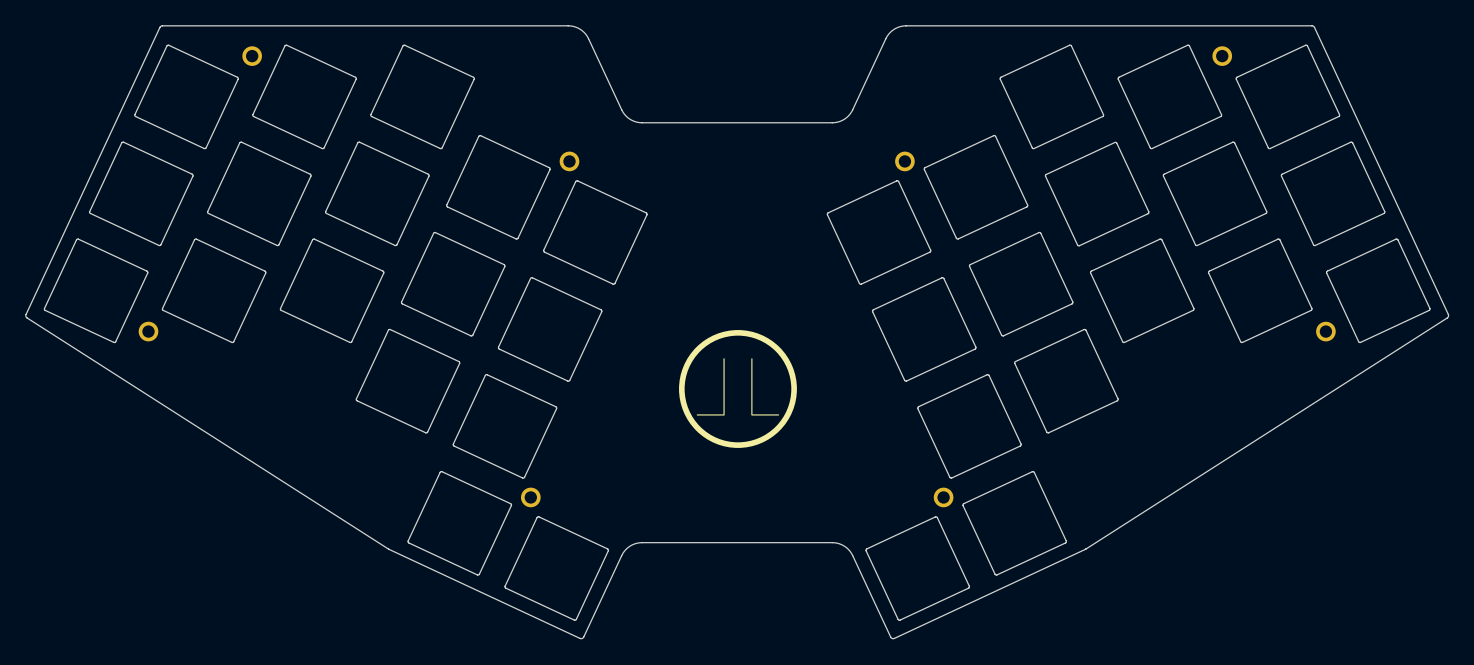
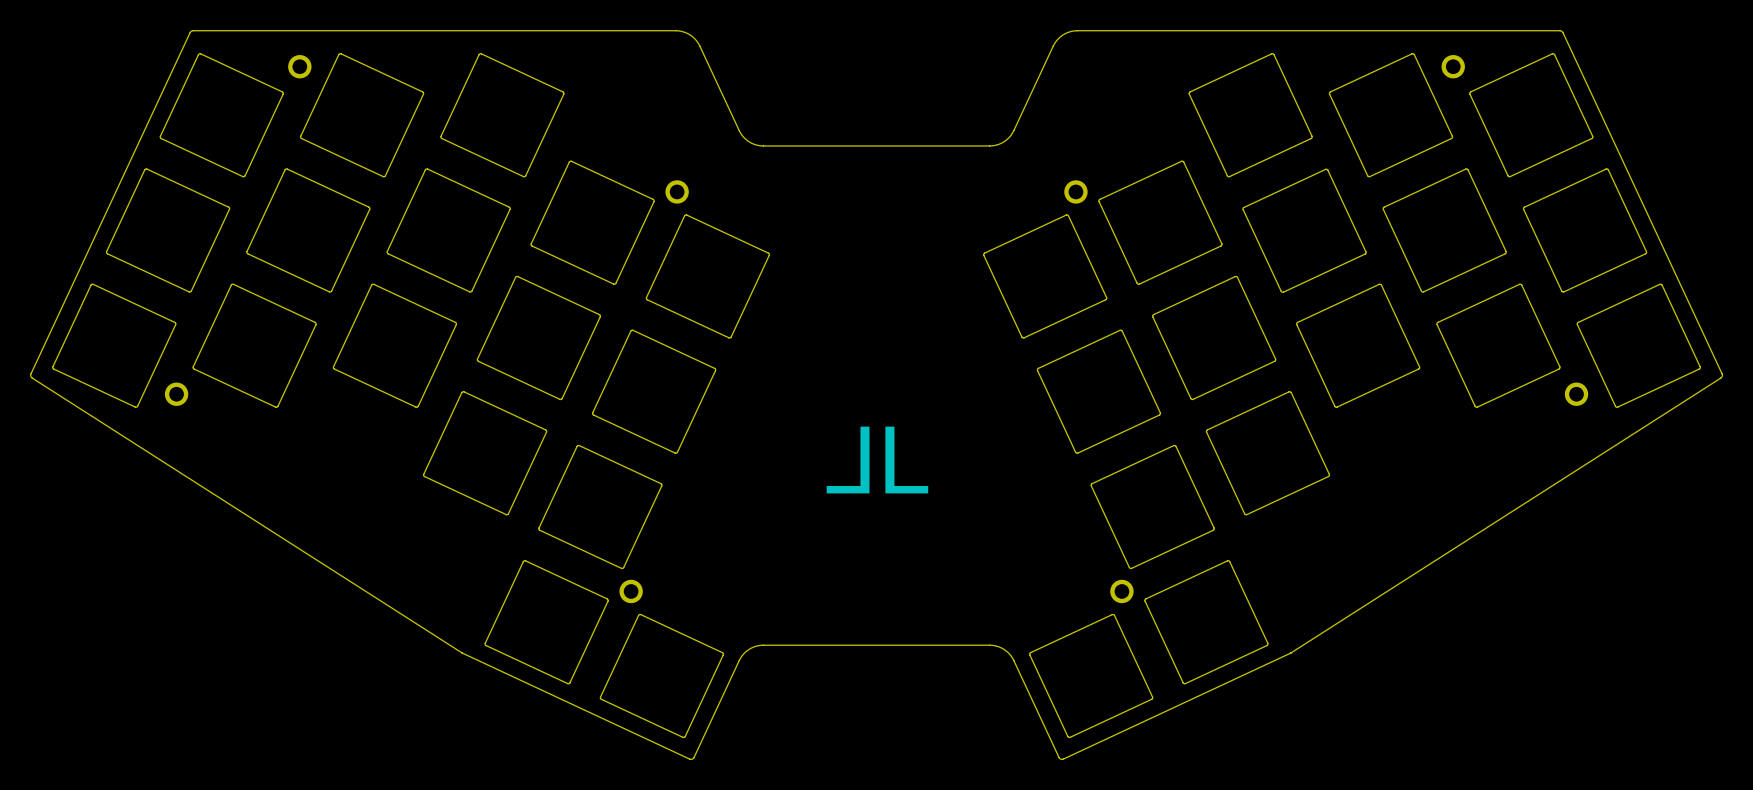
drawing: [679, 330, 797, 448] -> none

